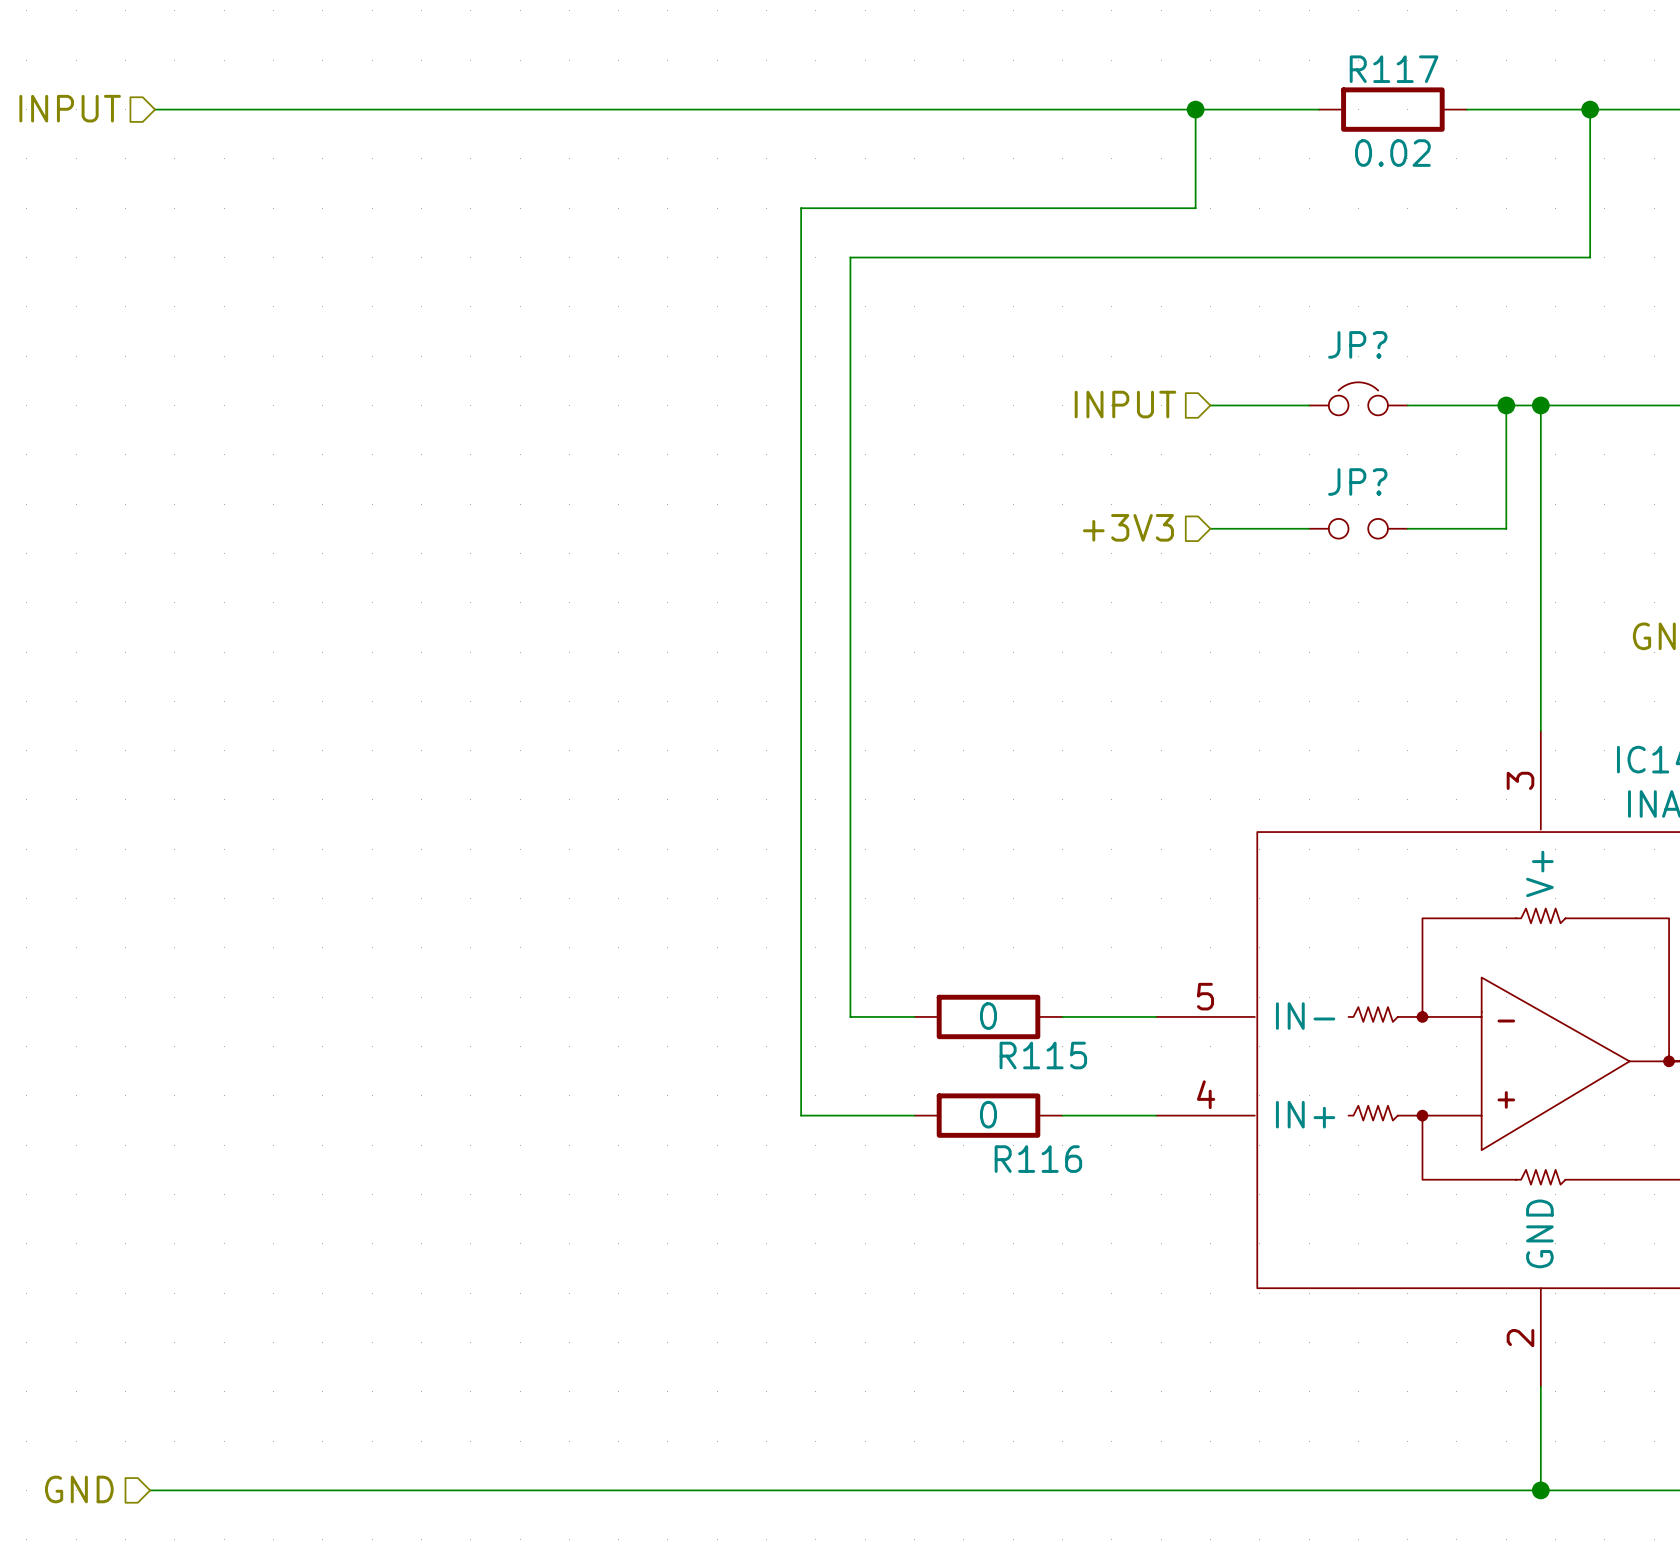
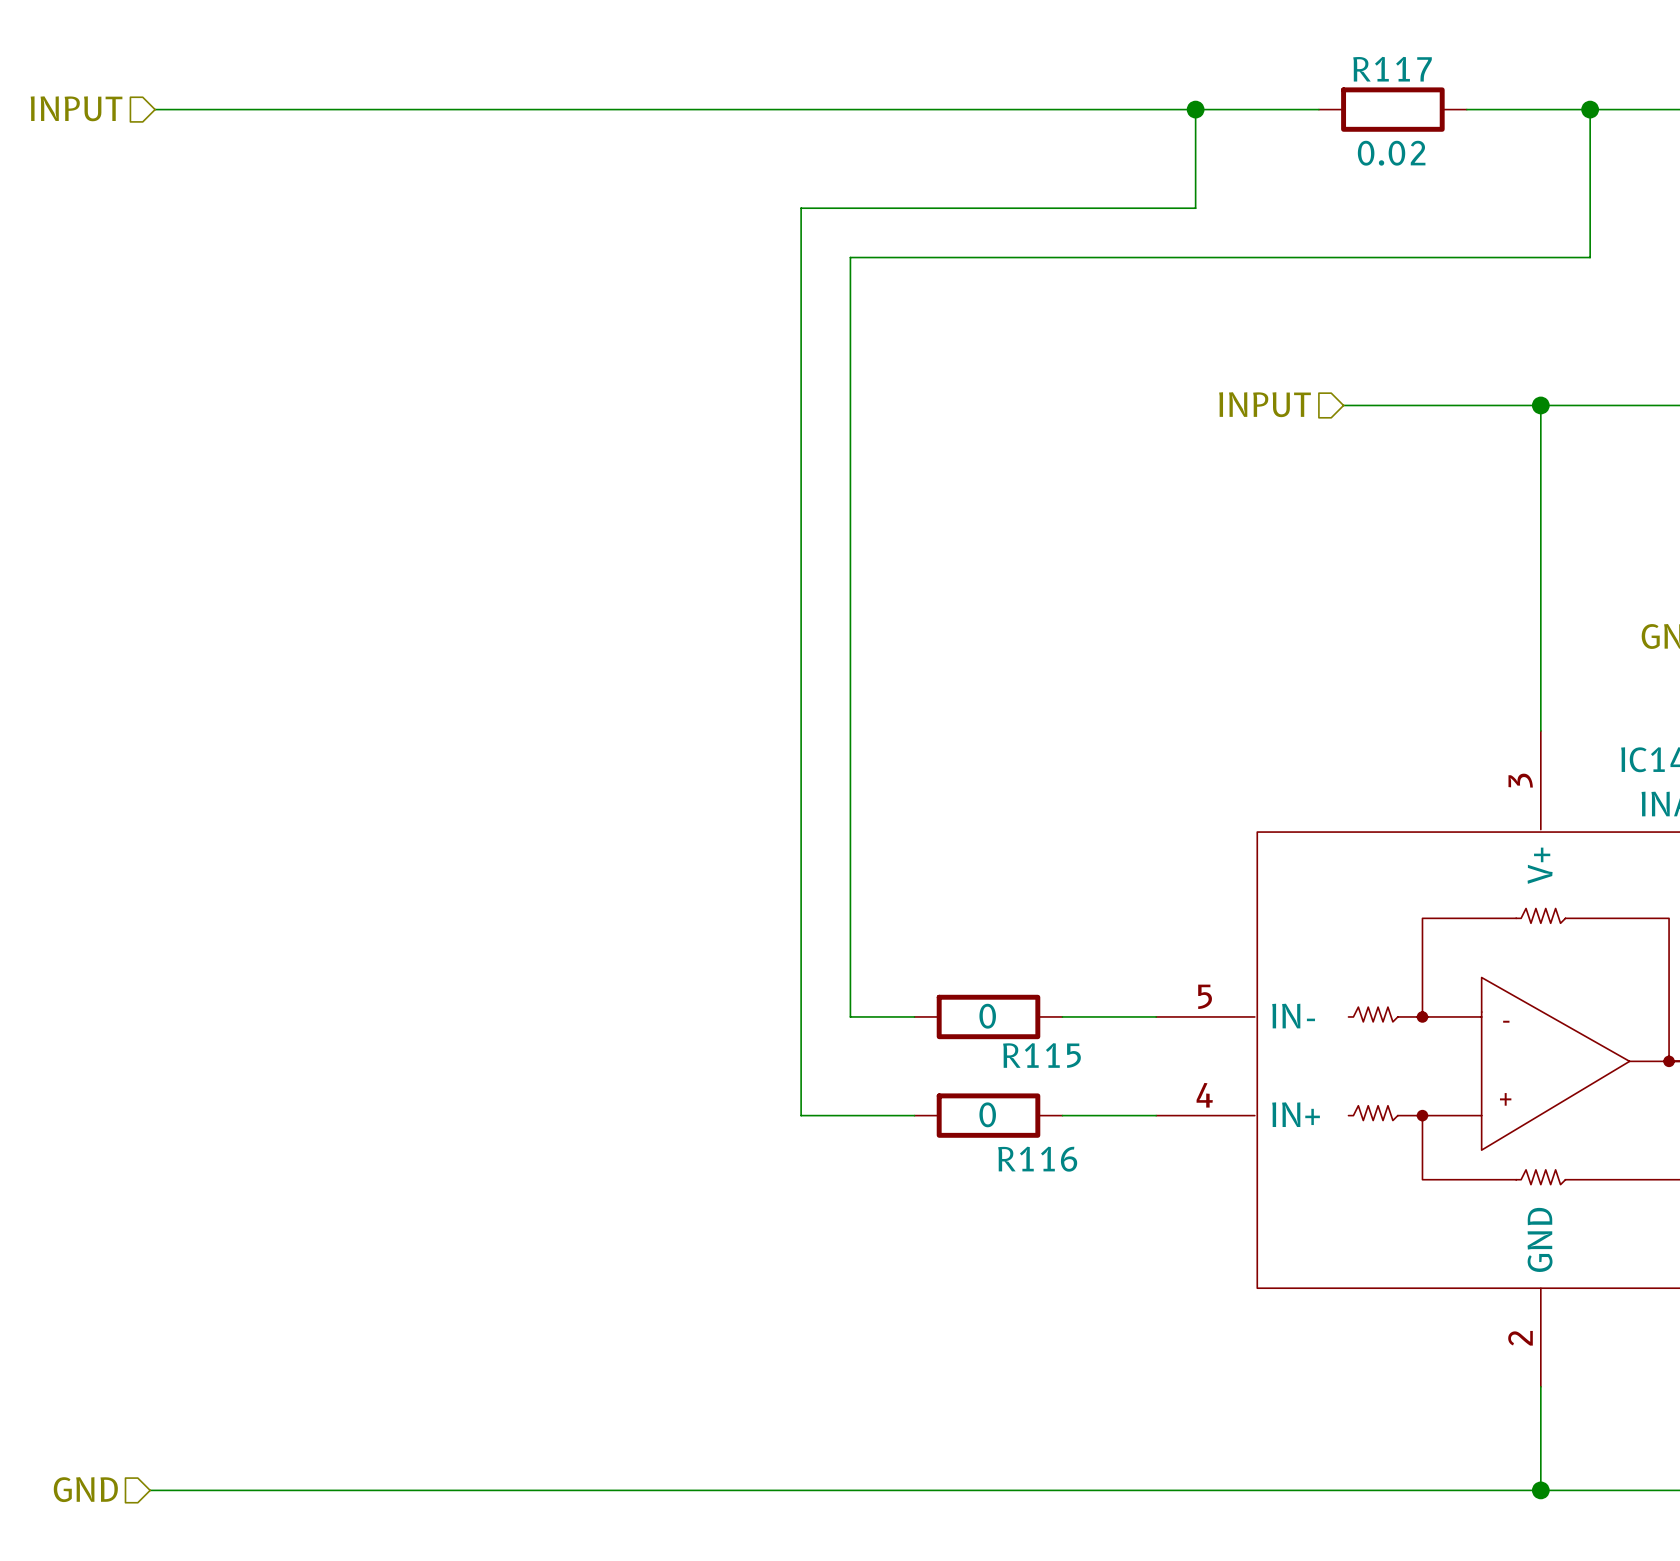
JP?: (1358, 398) -> none
hierarchical label position: INPUT (1125, 404) -> INPUT (1265, 404)
wire: (1210, 405) (1309, 405) -> none
wire: none -> (1343, 405) (1407, 405)
wire: (1506, 405) (1506, 528) (1407, 528) -> none
junction: (1506, 405) -> none
hierarchical label: +3V3 (1128, 527) -> none
wire: (1210, 528) (1309, 528) -> none
JP?: (1358, 528) -> none

